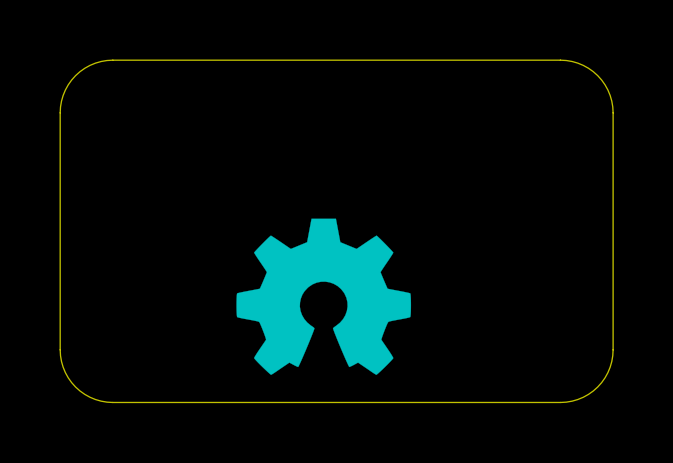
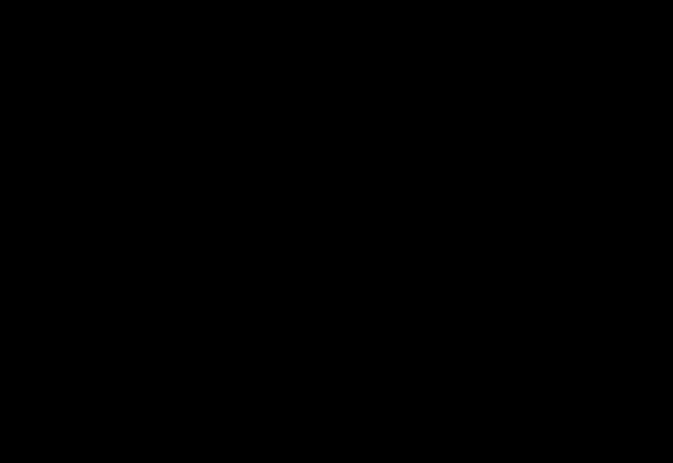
board edge: (112, 60) (560, 60) (572, 61) (588, 68) (605, 84) (610, 95) (613, 112) (613, 349) (610, 367) (605, 377) (597, 387) (583, 397) (560, 402) (112, 402) (95, 399) (84, 394) (68, 377) (60, 355) (60, 106) (65, 89) (75, 75) (89, 65) (112, 60) -> none
drawing: [236, 218, 412, 375] -> none

